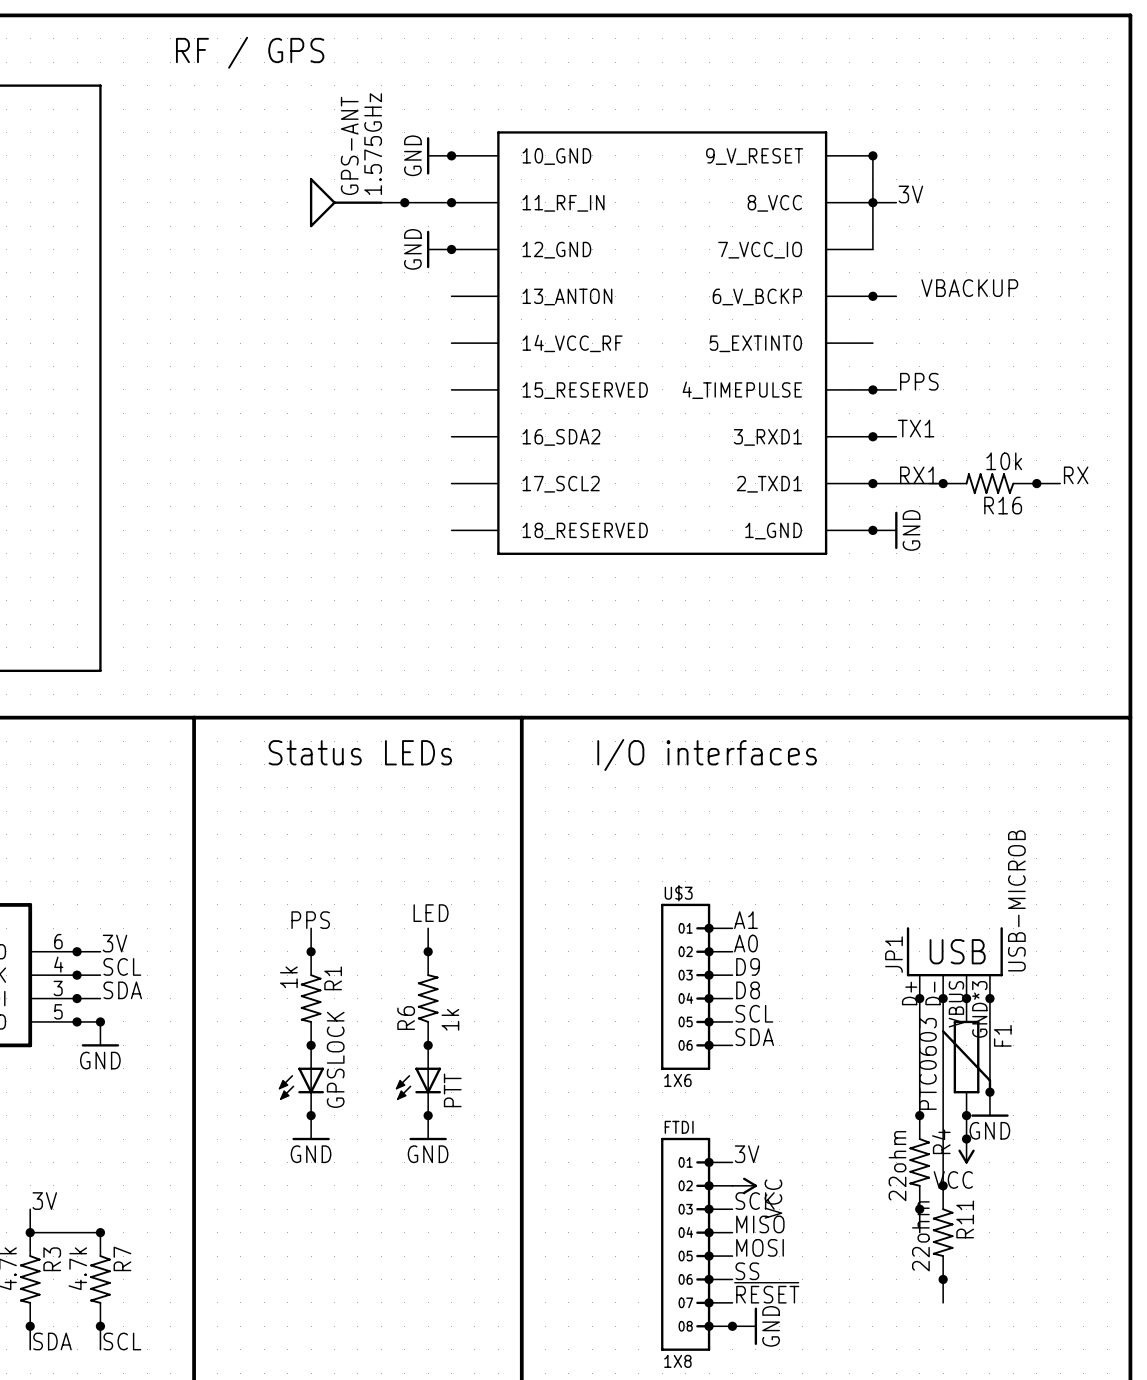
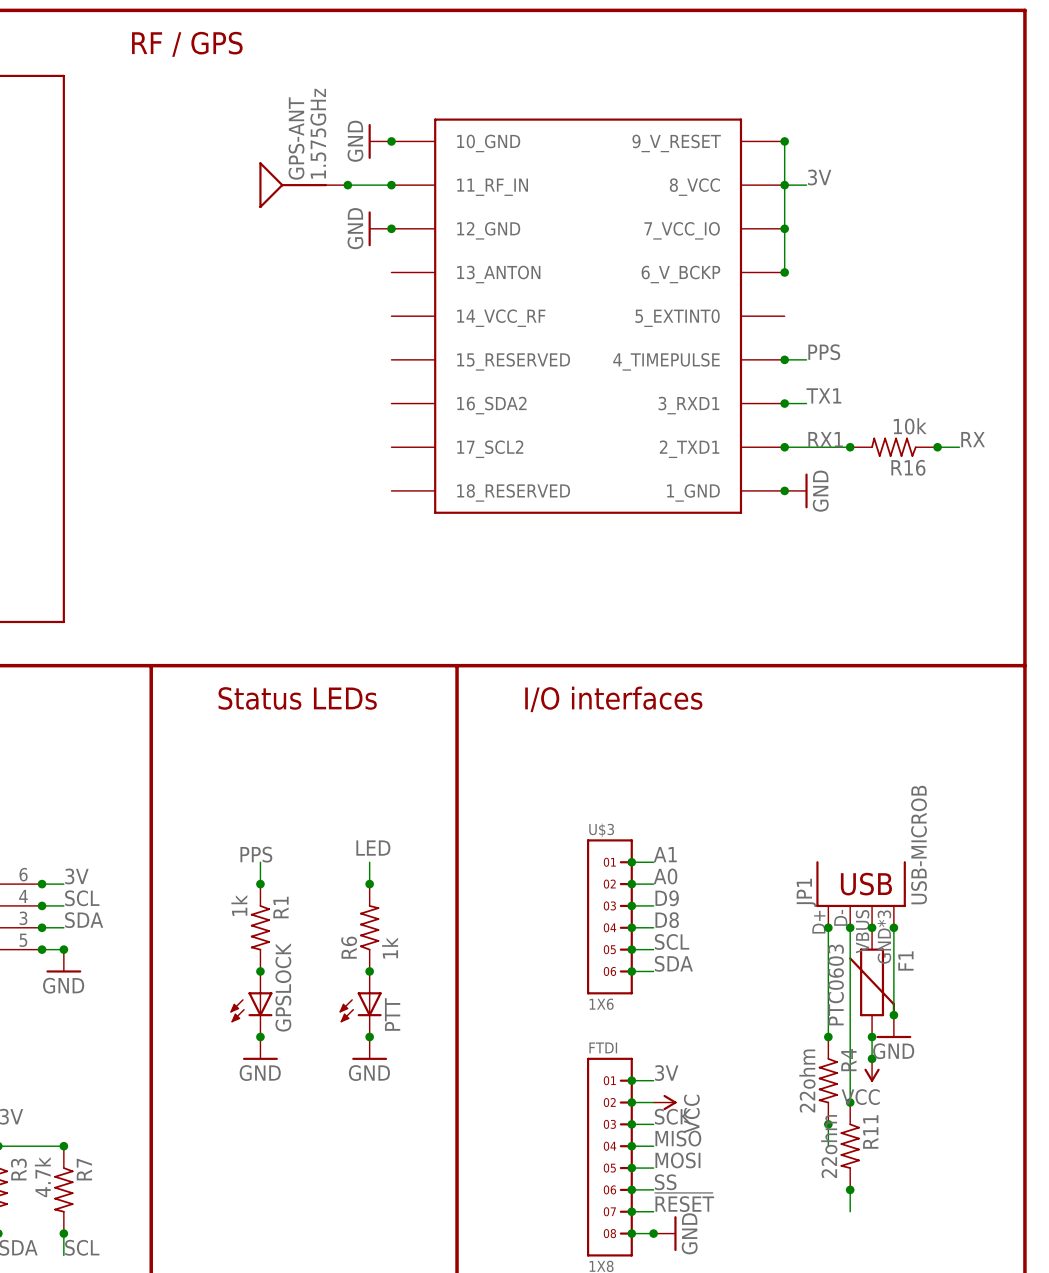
junction: none -> (784, 228)
label: VBACKUP (969, 288) -> none
wire: (872, 296) (896, 296) -> (784, 272) (784, 228)

